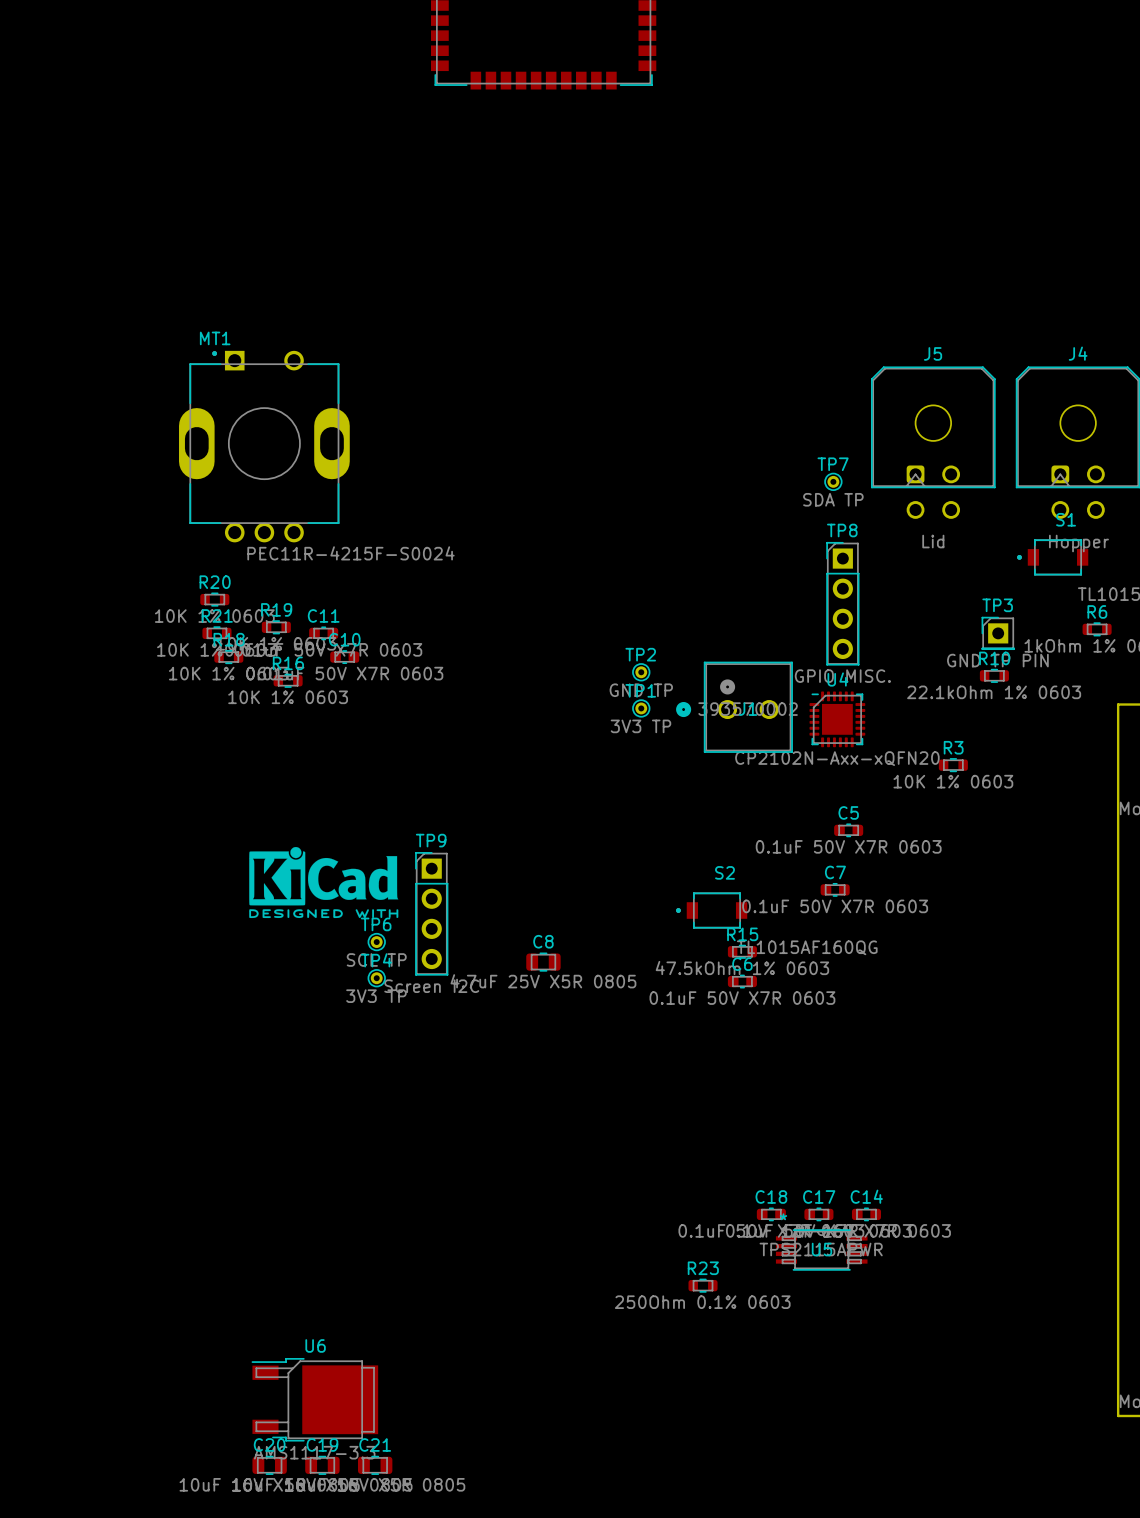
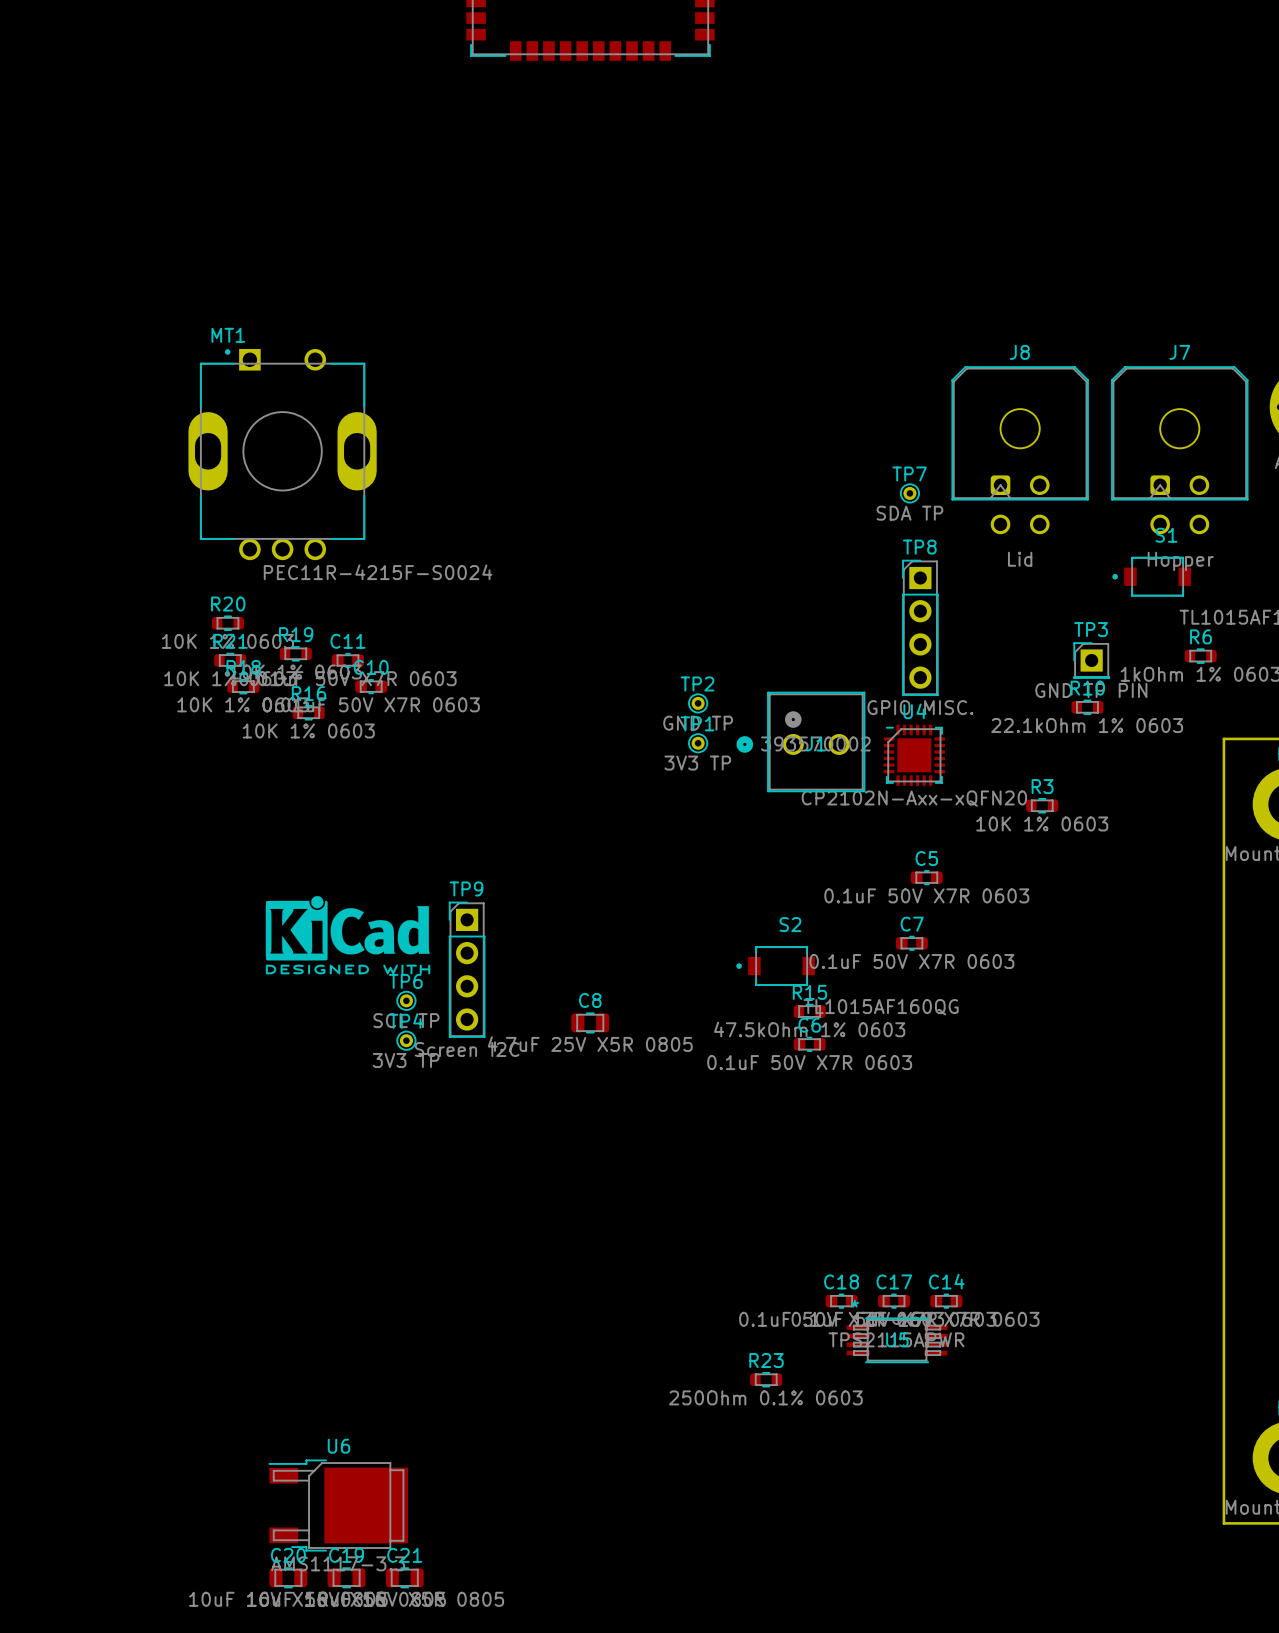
J5 name: J5 (933, 353) -> J8 (1019, 352)
J4 name: J4 (1078, 353) -> J7 (1179, 352)

